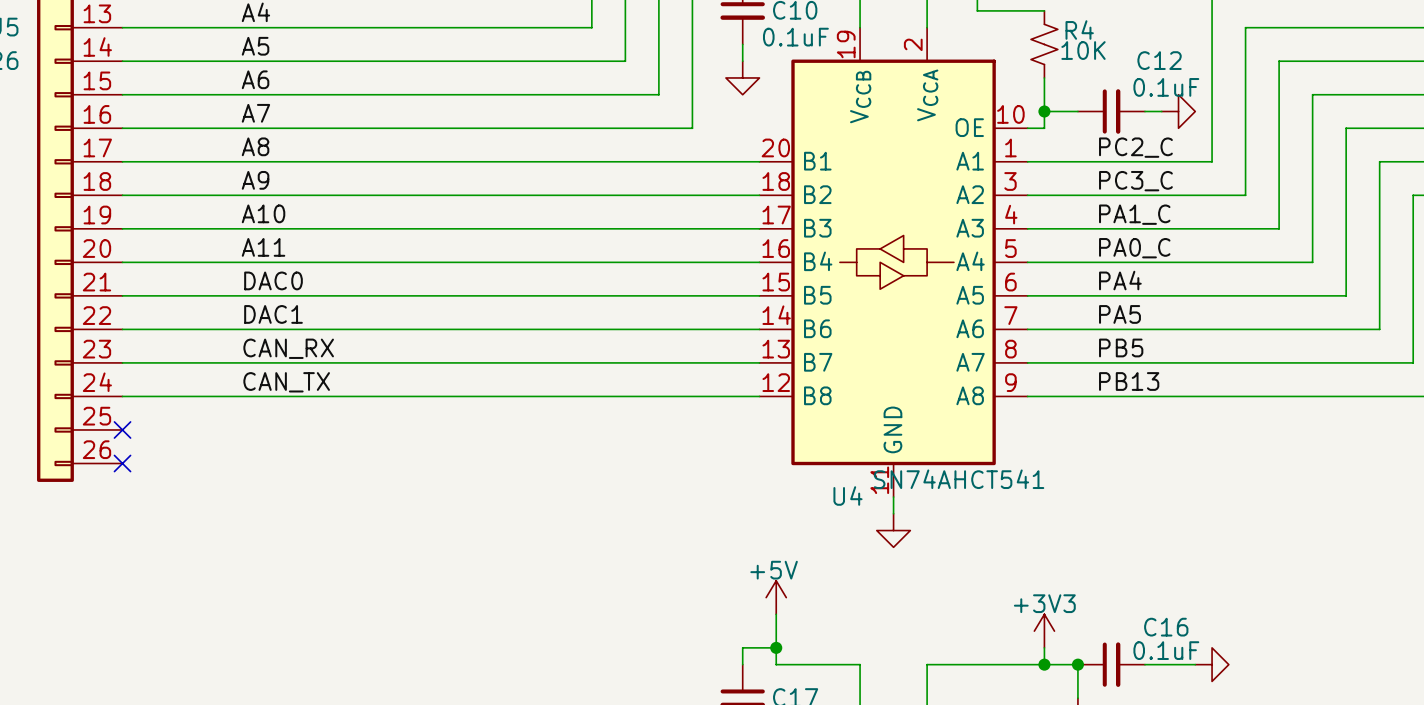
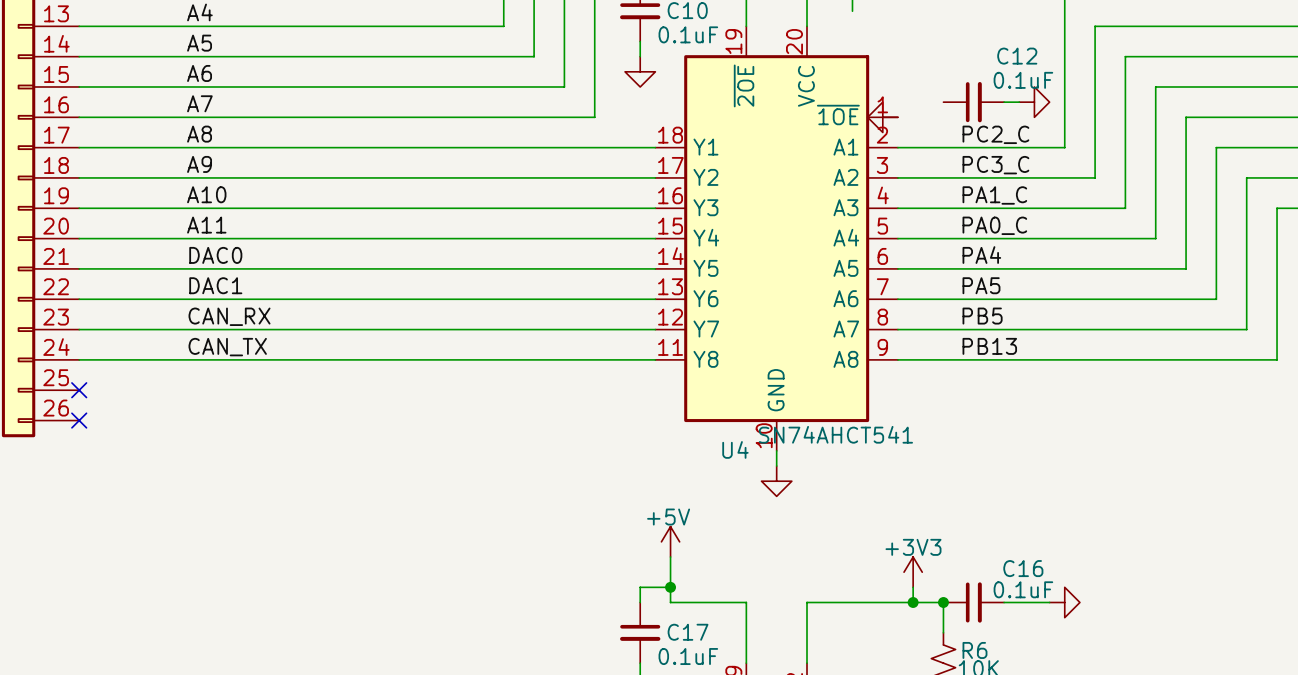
wire: (977, 10) (1044, 10) -> none
U4 symbol: [759, 27, 1028, 498] -> [655, 26, 898, 451]
R4: 10K (1044, 44) -> none
wire: (1044, 77) (1044, 128) (1027, 128) -> none
wire: (1044, 111) (1077, 111) -> none
junction: (1044, 111) -> none
power symbol: none -> (882, 117)

